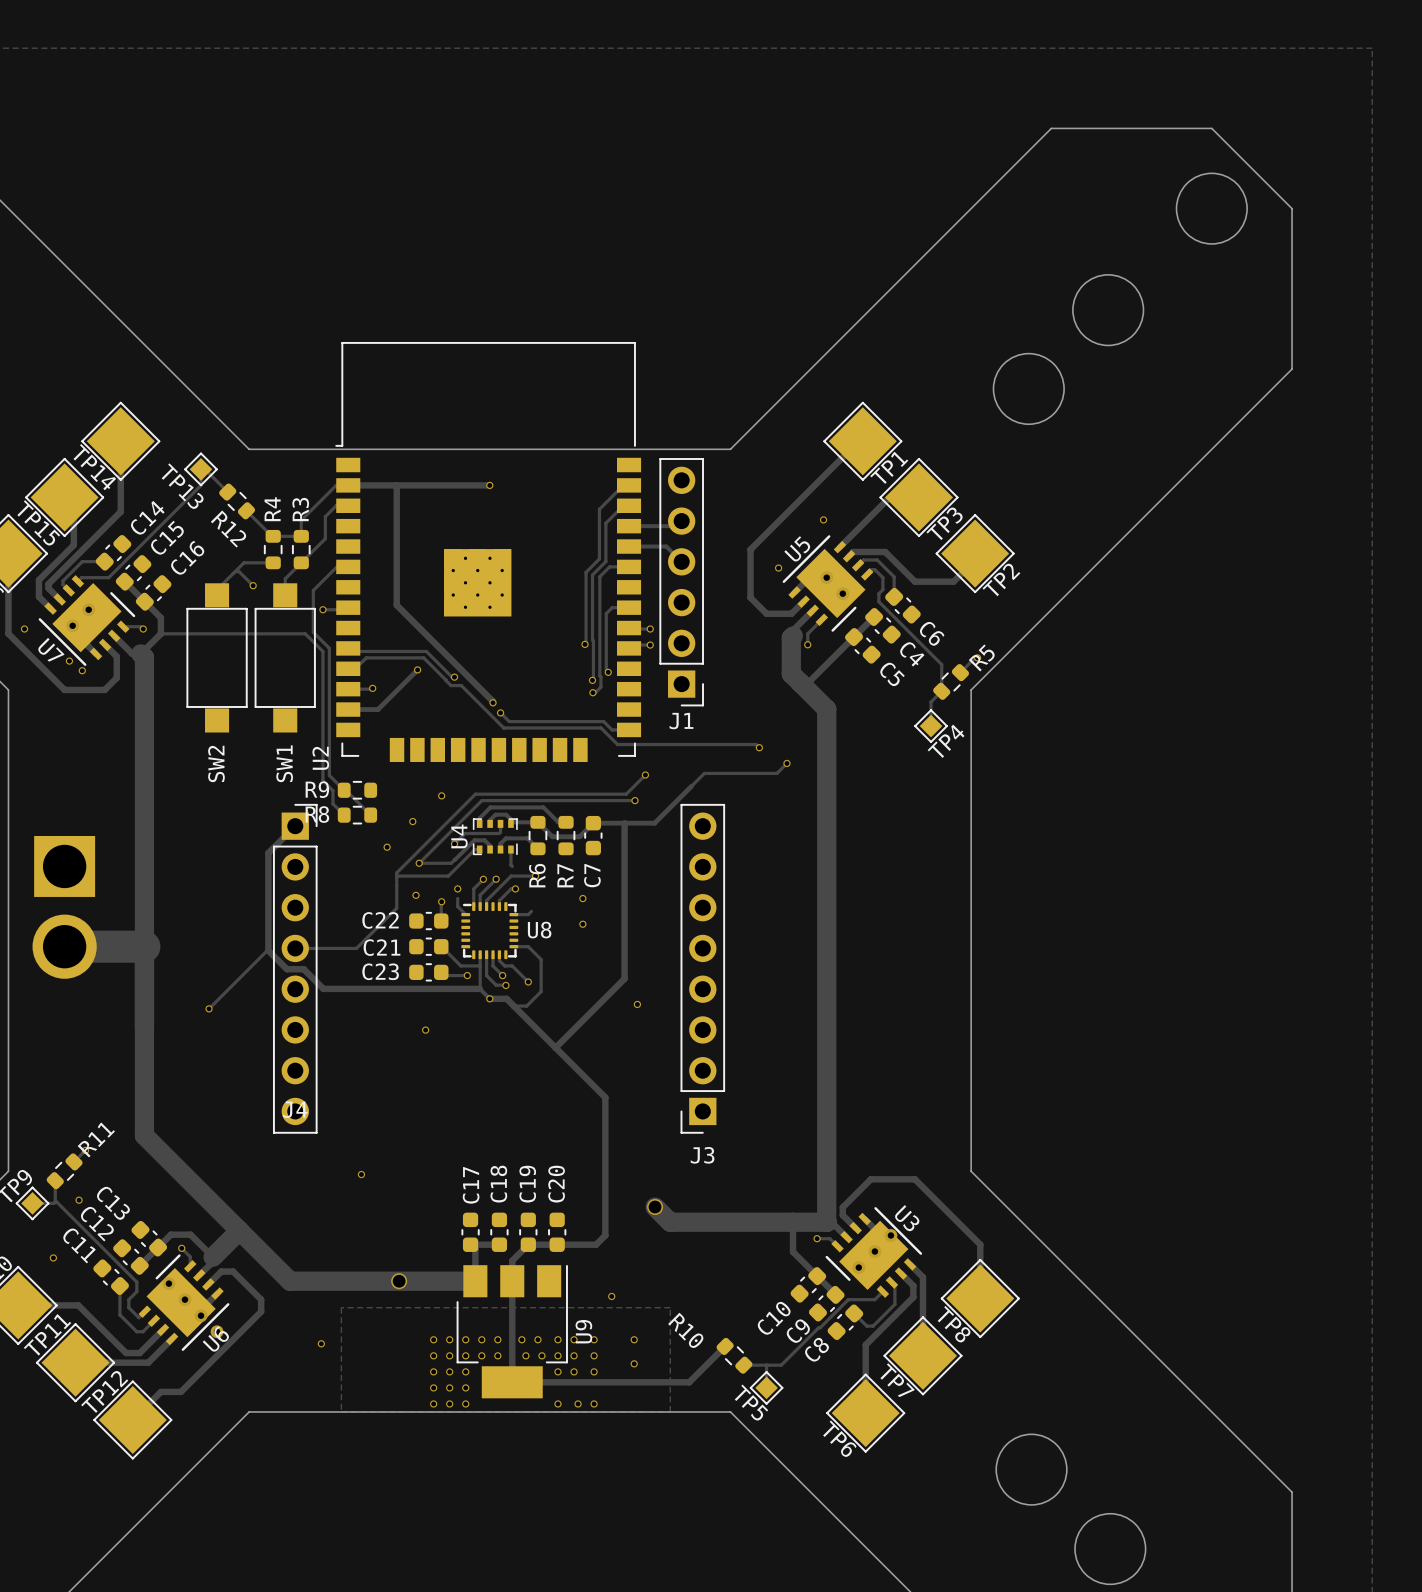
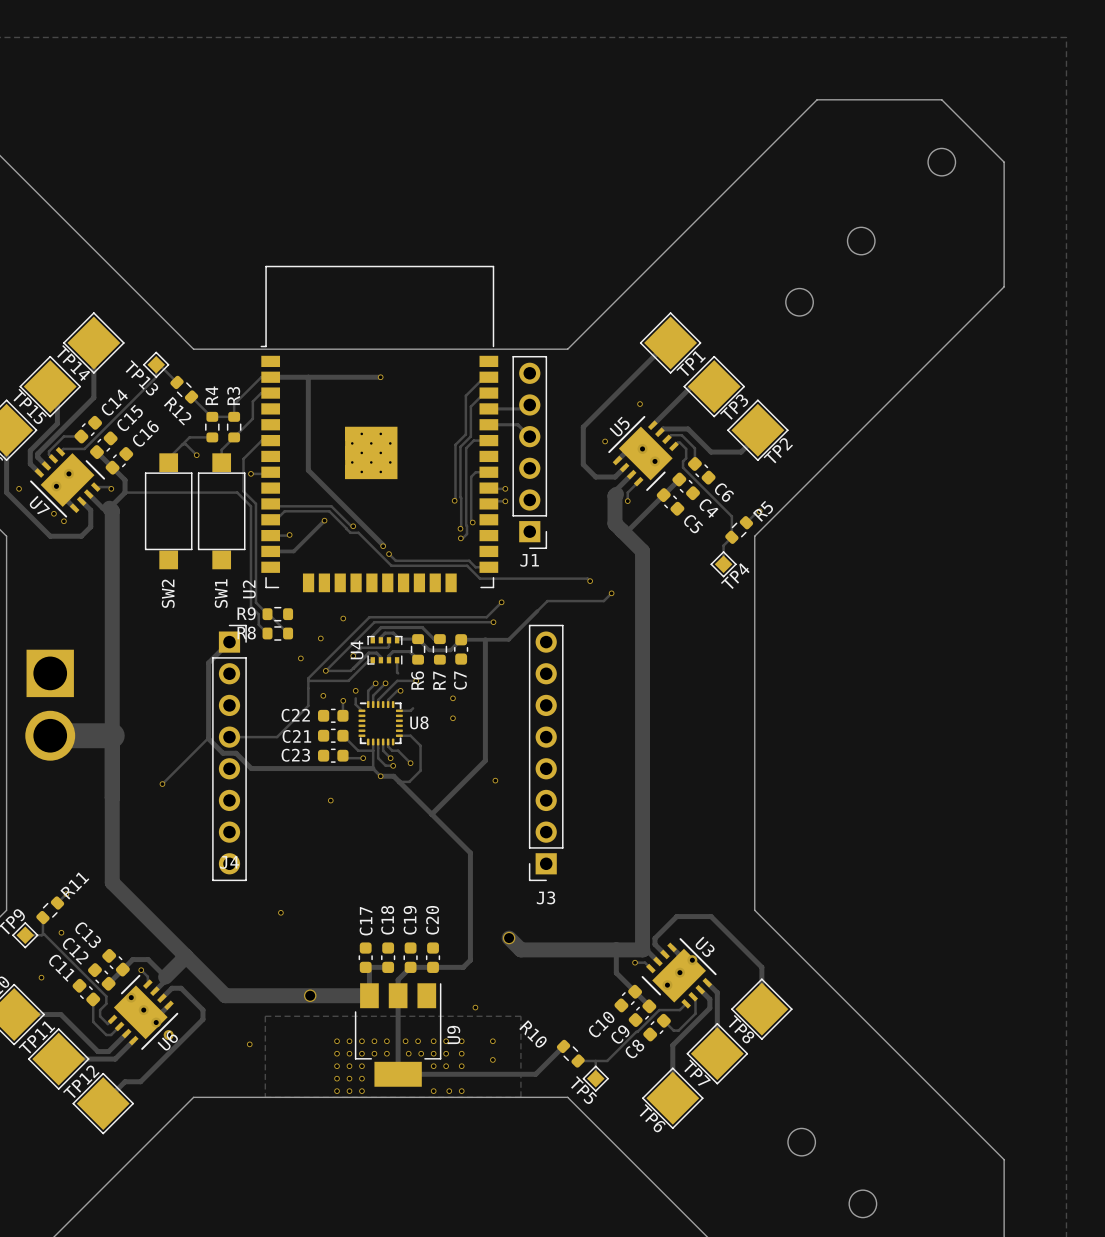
round board edge size: [1175, 172, 1248, 245] -> [927, 147, 957, 177]
round board edge size: [1072, 274, 1145, 347] -> [846, 226, 876, 256]
round board edge size: [992, 352, 1065, 426] -> [785, 287, 814, 317]
round board edge size: [995, 1433, 1068, 1506] -> [787, 1127, 817, 1157]
round board edge size: [1074, 1512, 1147, 1586] -> [848, 1189, 878, 1219]

